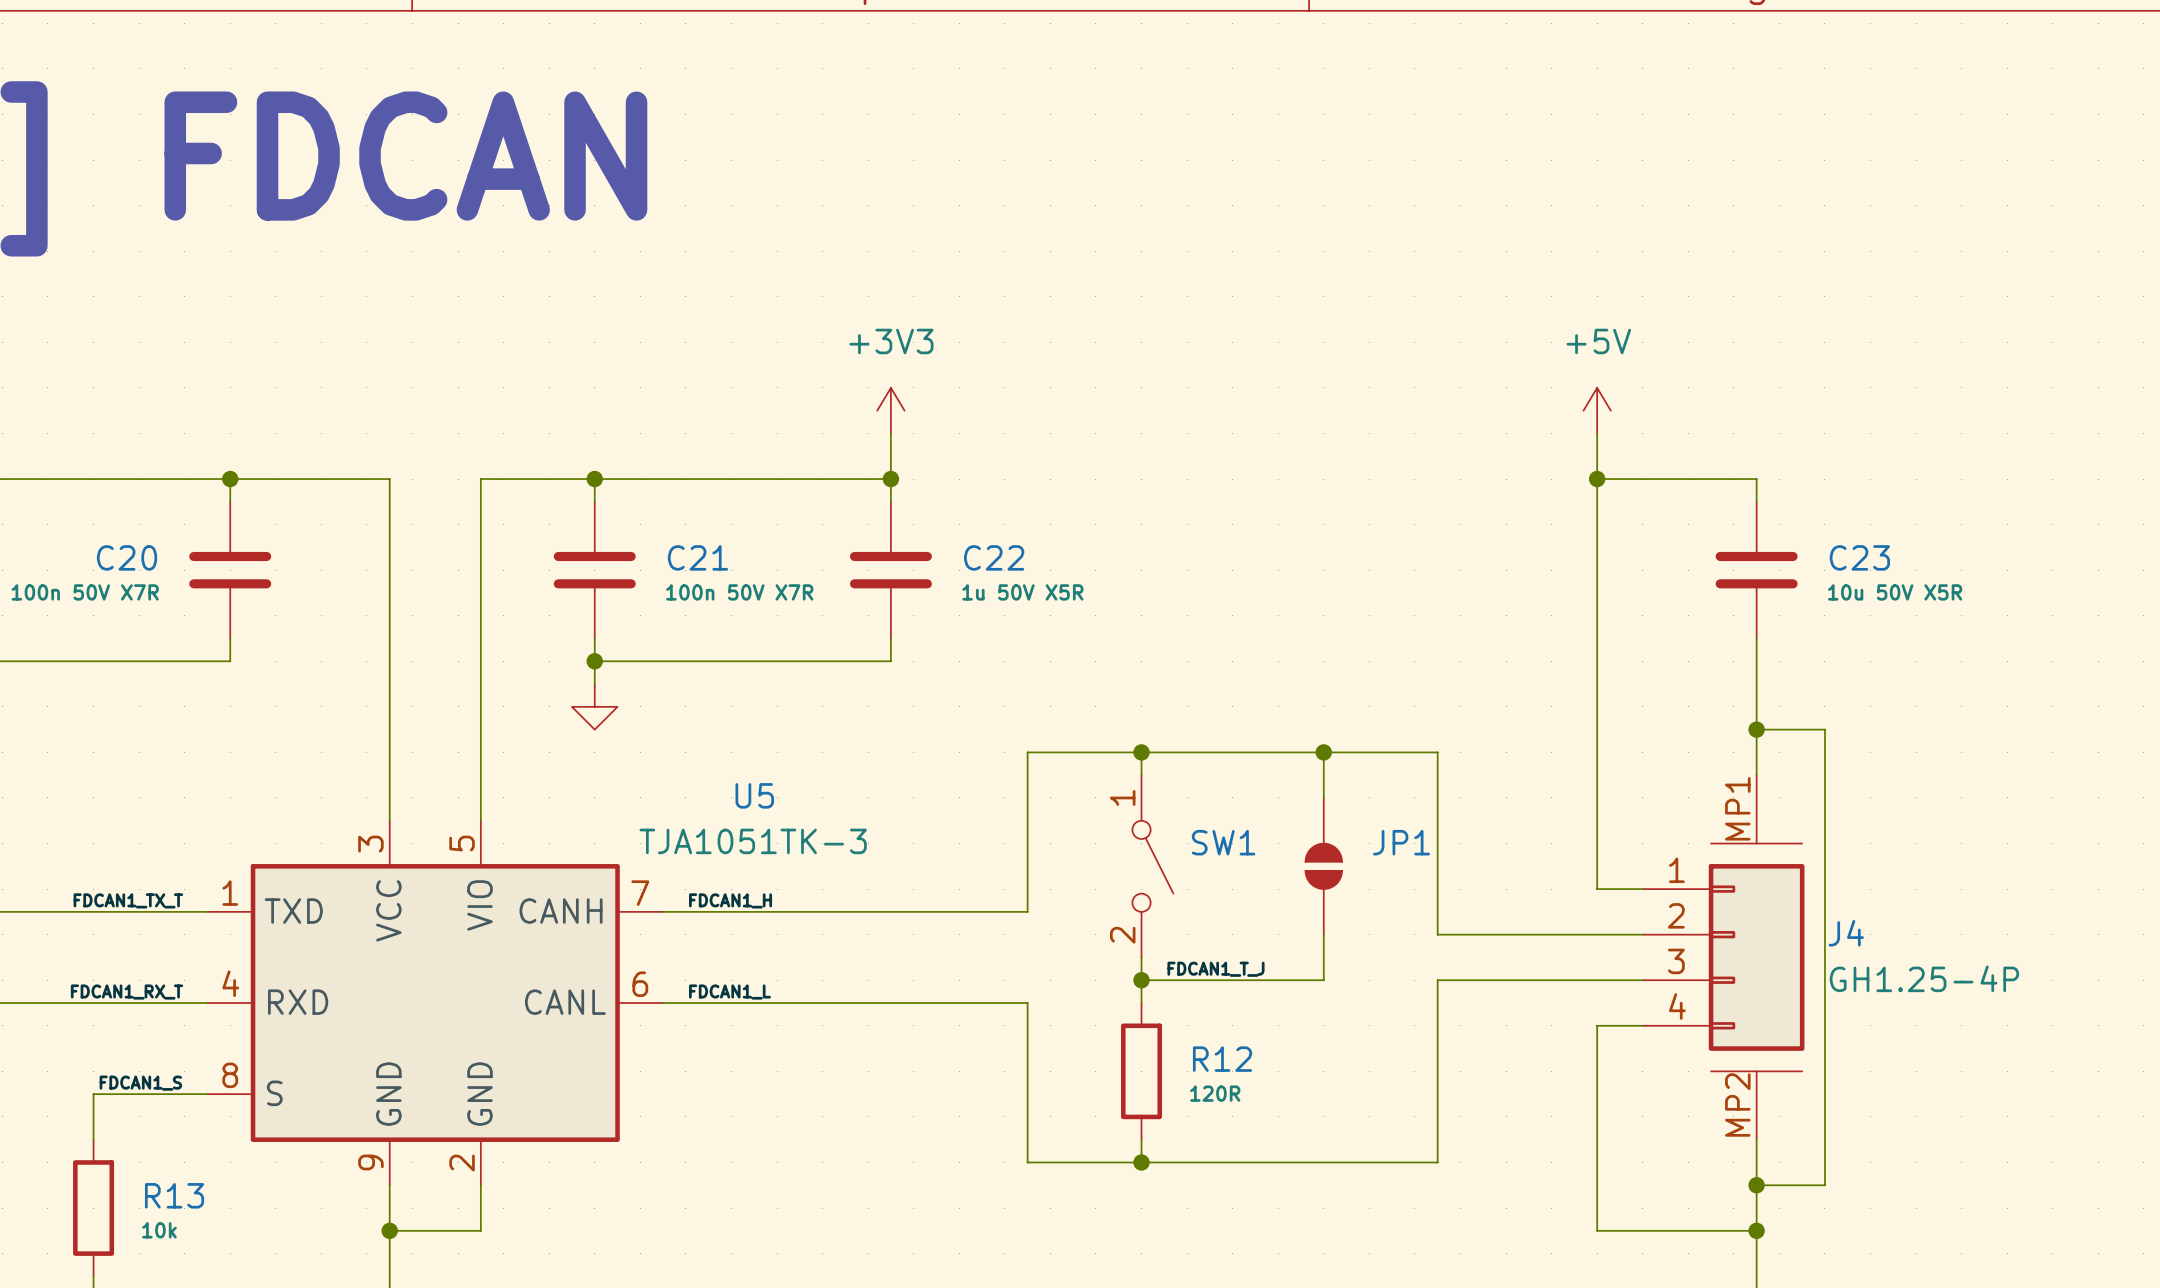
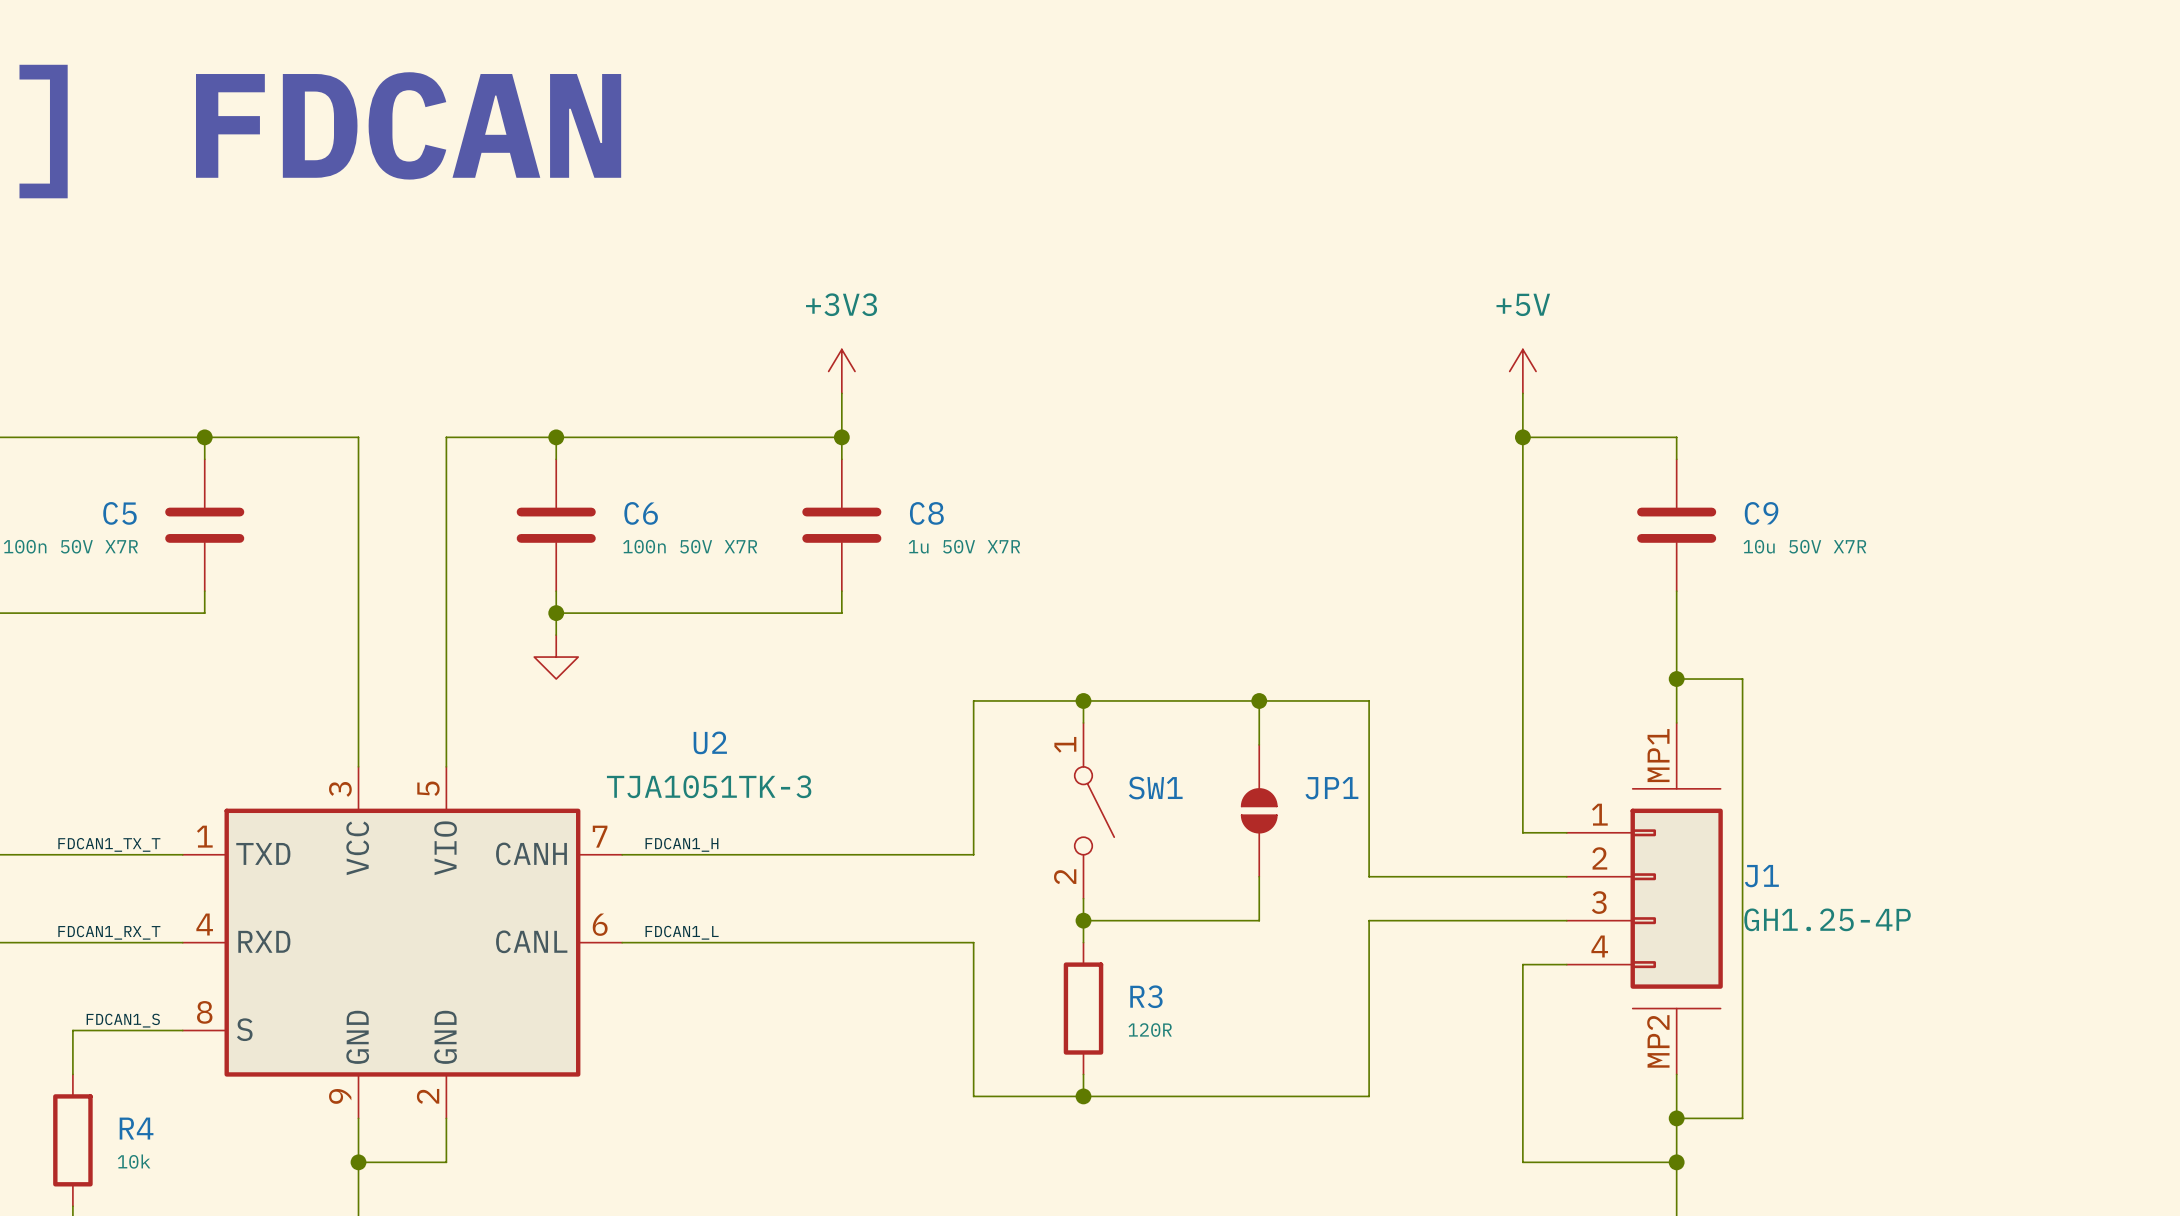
C20 name: C20 (127, 557) -> C5 (119, 513)
C21 name: C21 (697, 557) -> C6 (641, 513)
C22 name: C22 (994, 557) -> C8 (926, 513)
C23 name: C23 (1859, 557) -> C9 (1761, 513)
C22 value: 1u 50V X5R (1022, 592) -> 1u 50V X7R (964, 546)
C23 value: 10u 50V X5R (1895, 592) -> 10u 50V X7R (1804, 546)
U5 name: U5 (754, 795) -> U2 (710, 742)
J4 name: J4 (1846, 933) -> J1 (1761, 876)
label: FDCAN1_T_J (1216, 969) -> none
R12 name: R12 (1222, 1059) -> R3 (1146, 996)
R13 name: R13 (174, 1195) -> R4 (136, 1128)

